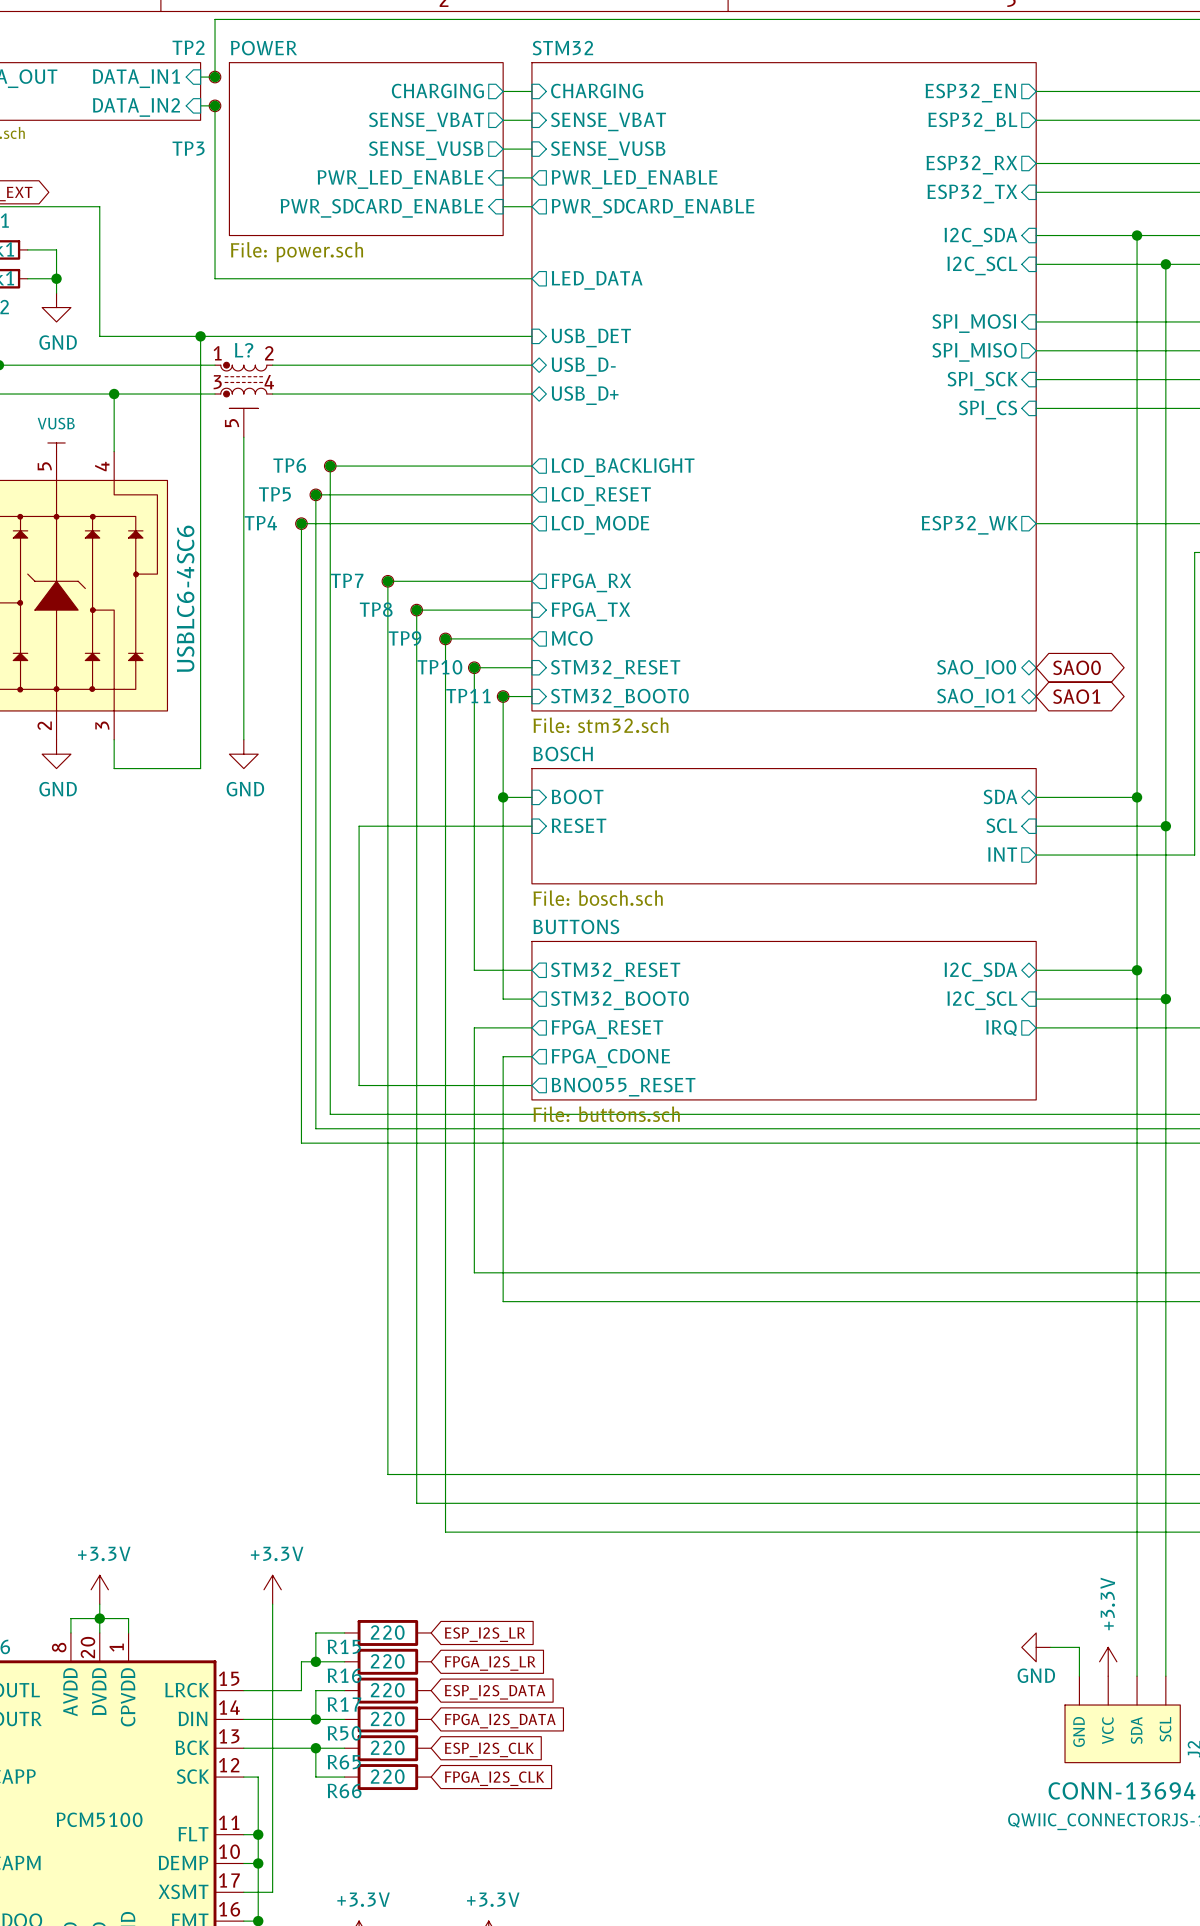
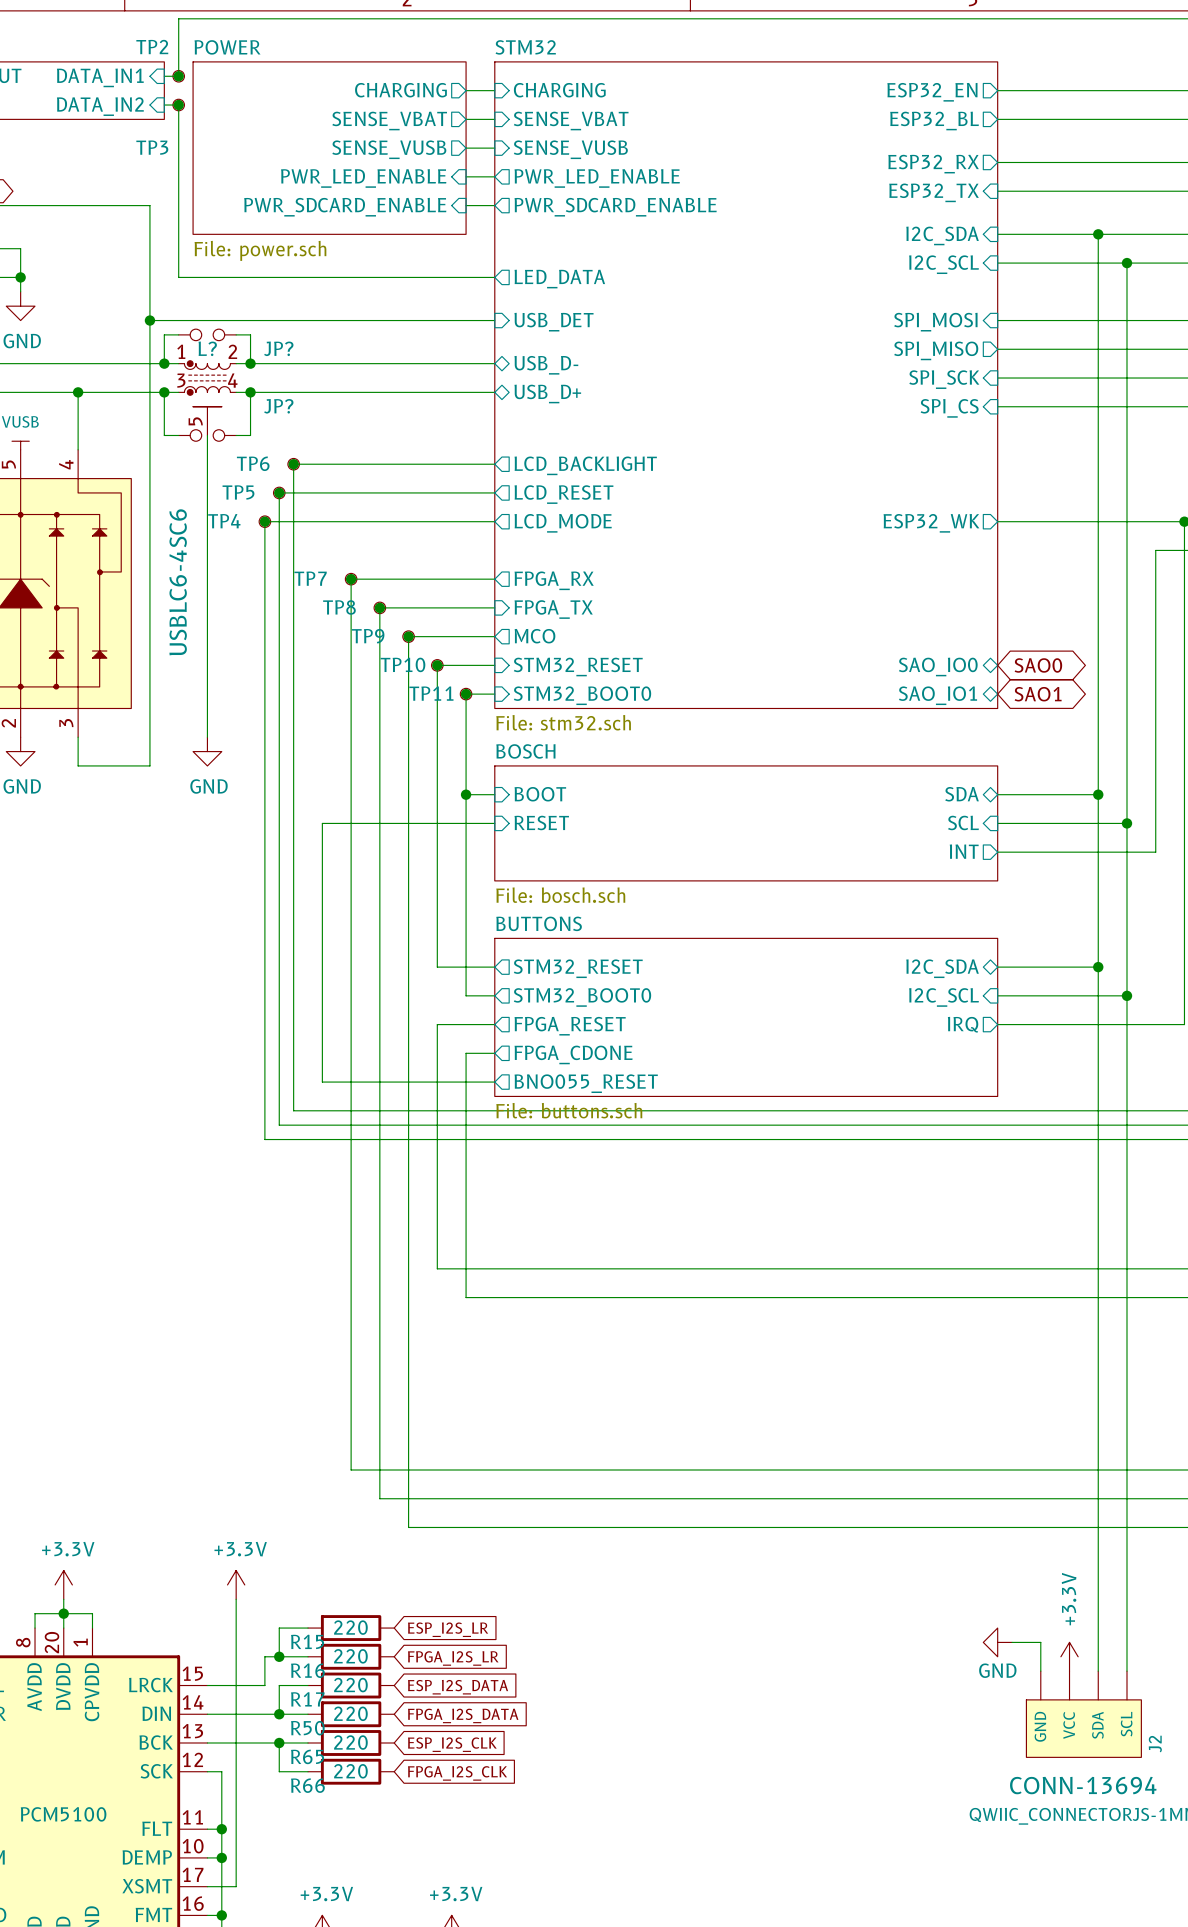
wire: (99, 206) (99, 336) (200, 336) -> none
wire: none -> (149, 320) (494, 320)
junction: none -> (149, 320)
junction: (200, 336) -> none
wire: (215, 336) (272, 336) -> none
JP?: none -> (207, 334)
wire: (287, 336) (531, 336) -> (250, 334) (250, 363)
sheet pin position: USB_DET (591, 337) -> USB_DET (553, 322)
wire: (200, 365) (200, 394) -> none
junction: none -> (164, 363)
junction: none -> (250, 363)
junction: none -> (164, 392)
wire: none -> (250, 392) (250, 435) (236, 435)
junction: none -> (250, 392)
wire: (200, 437) (200, 768) (186, 768) -> (63, 205) (149, 205) (149, 765)
wire: none -> (164, 435) (178, 435)
JP?: none -> (207, 435)
part value position: USBLC6-4SC6 (185, 598) -> USBLC6-4SC6 (178, 582)

